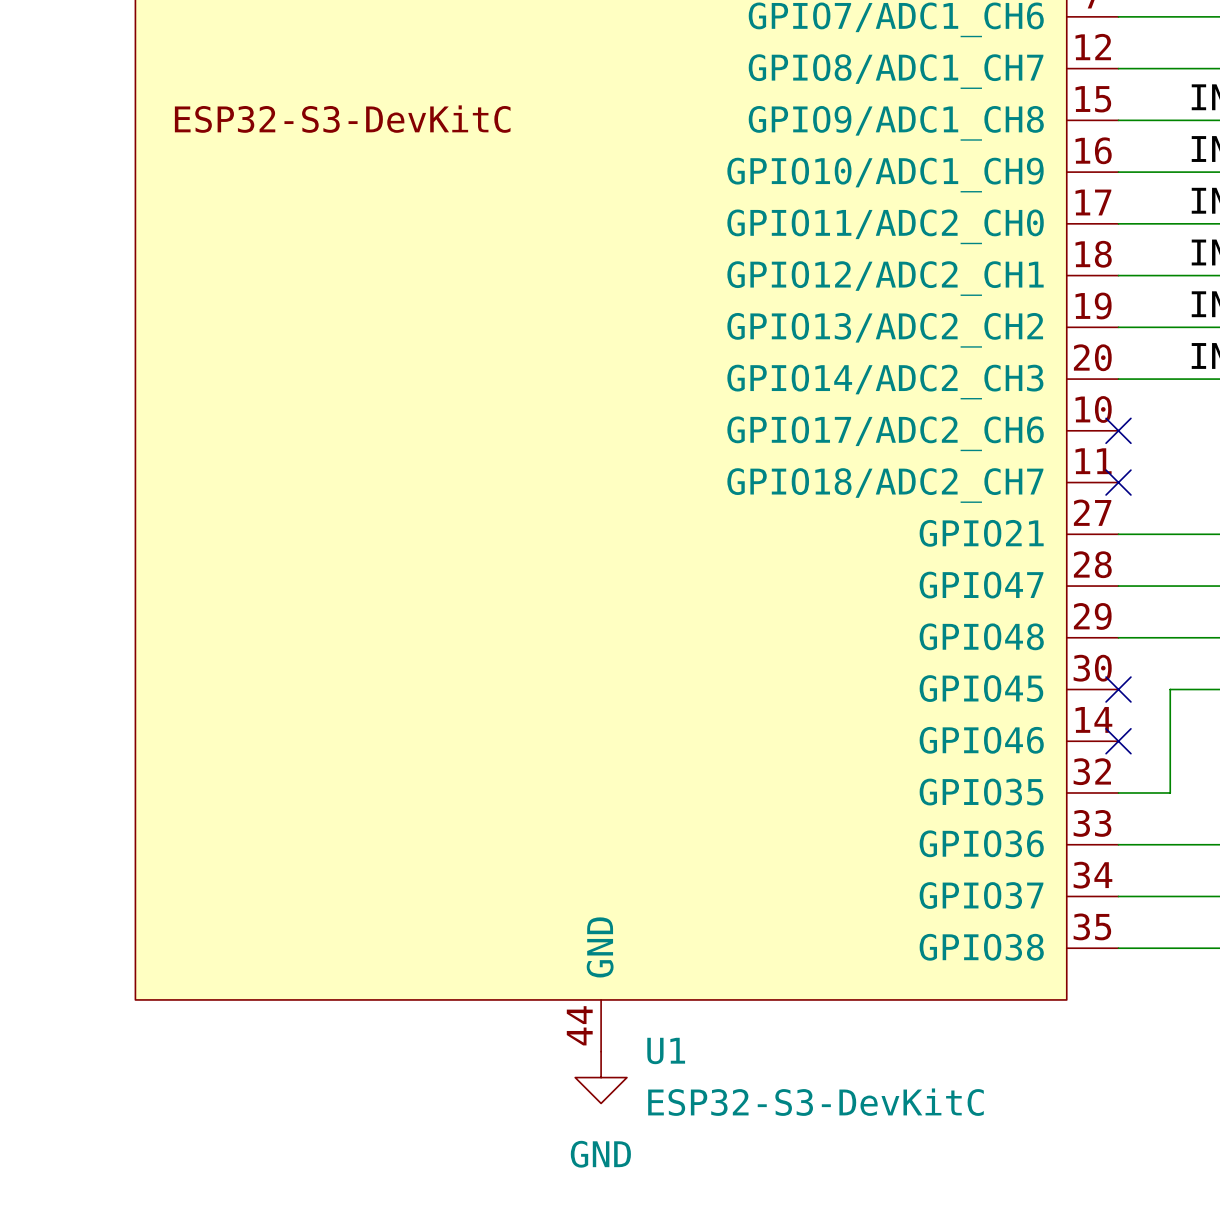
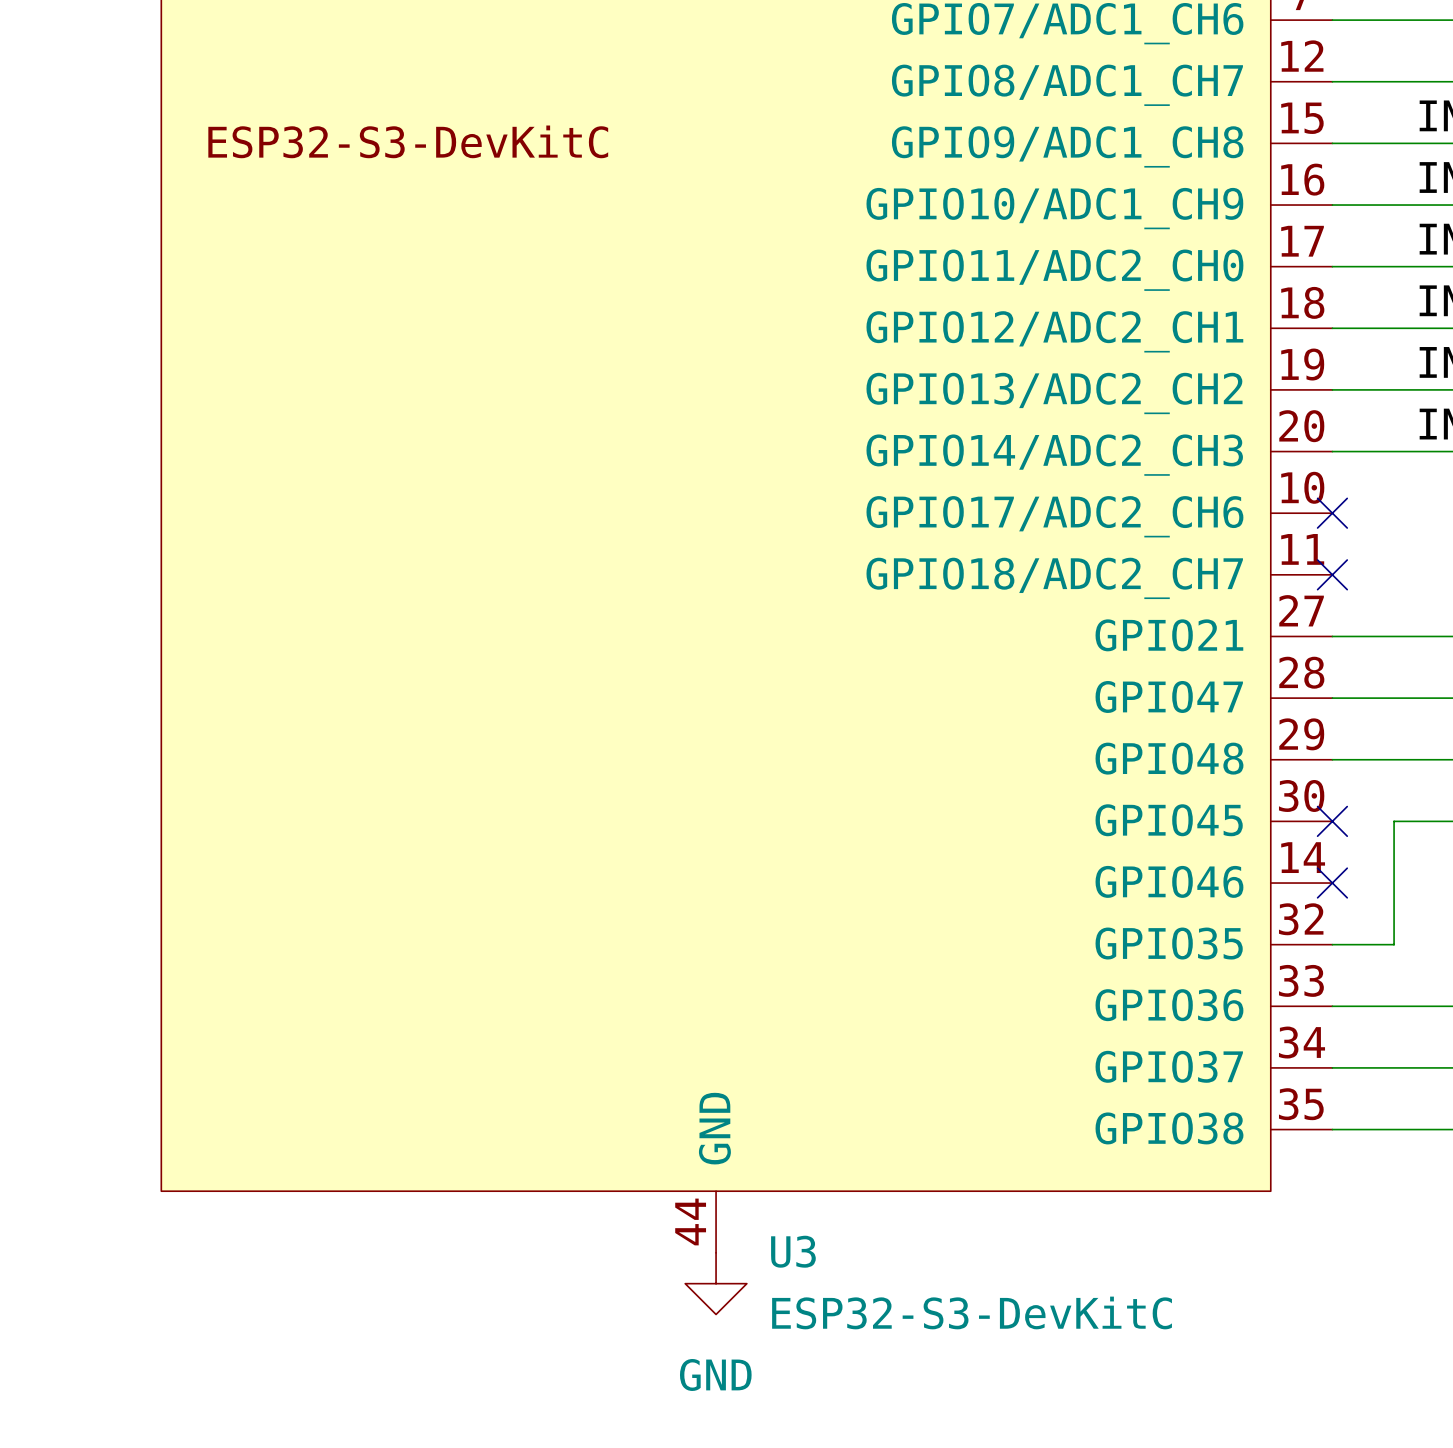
U1 name: U1 (666, 1050) -> U3 (793, 1251)

